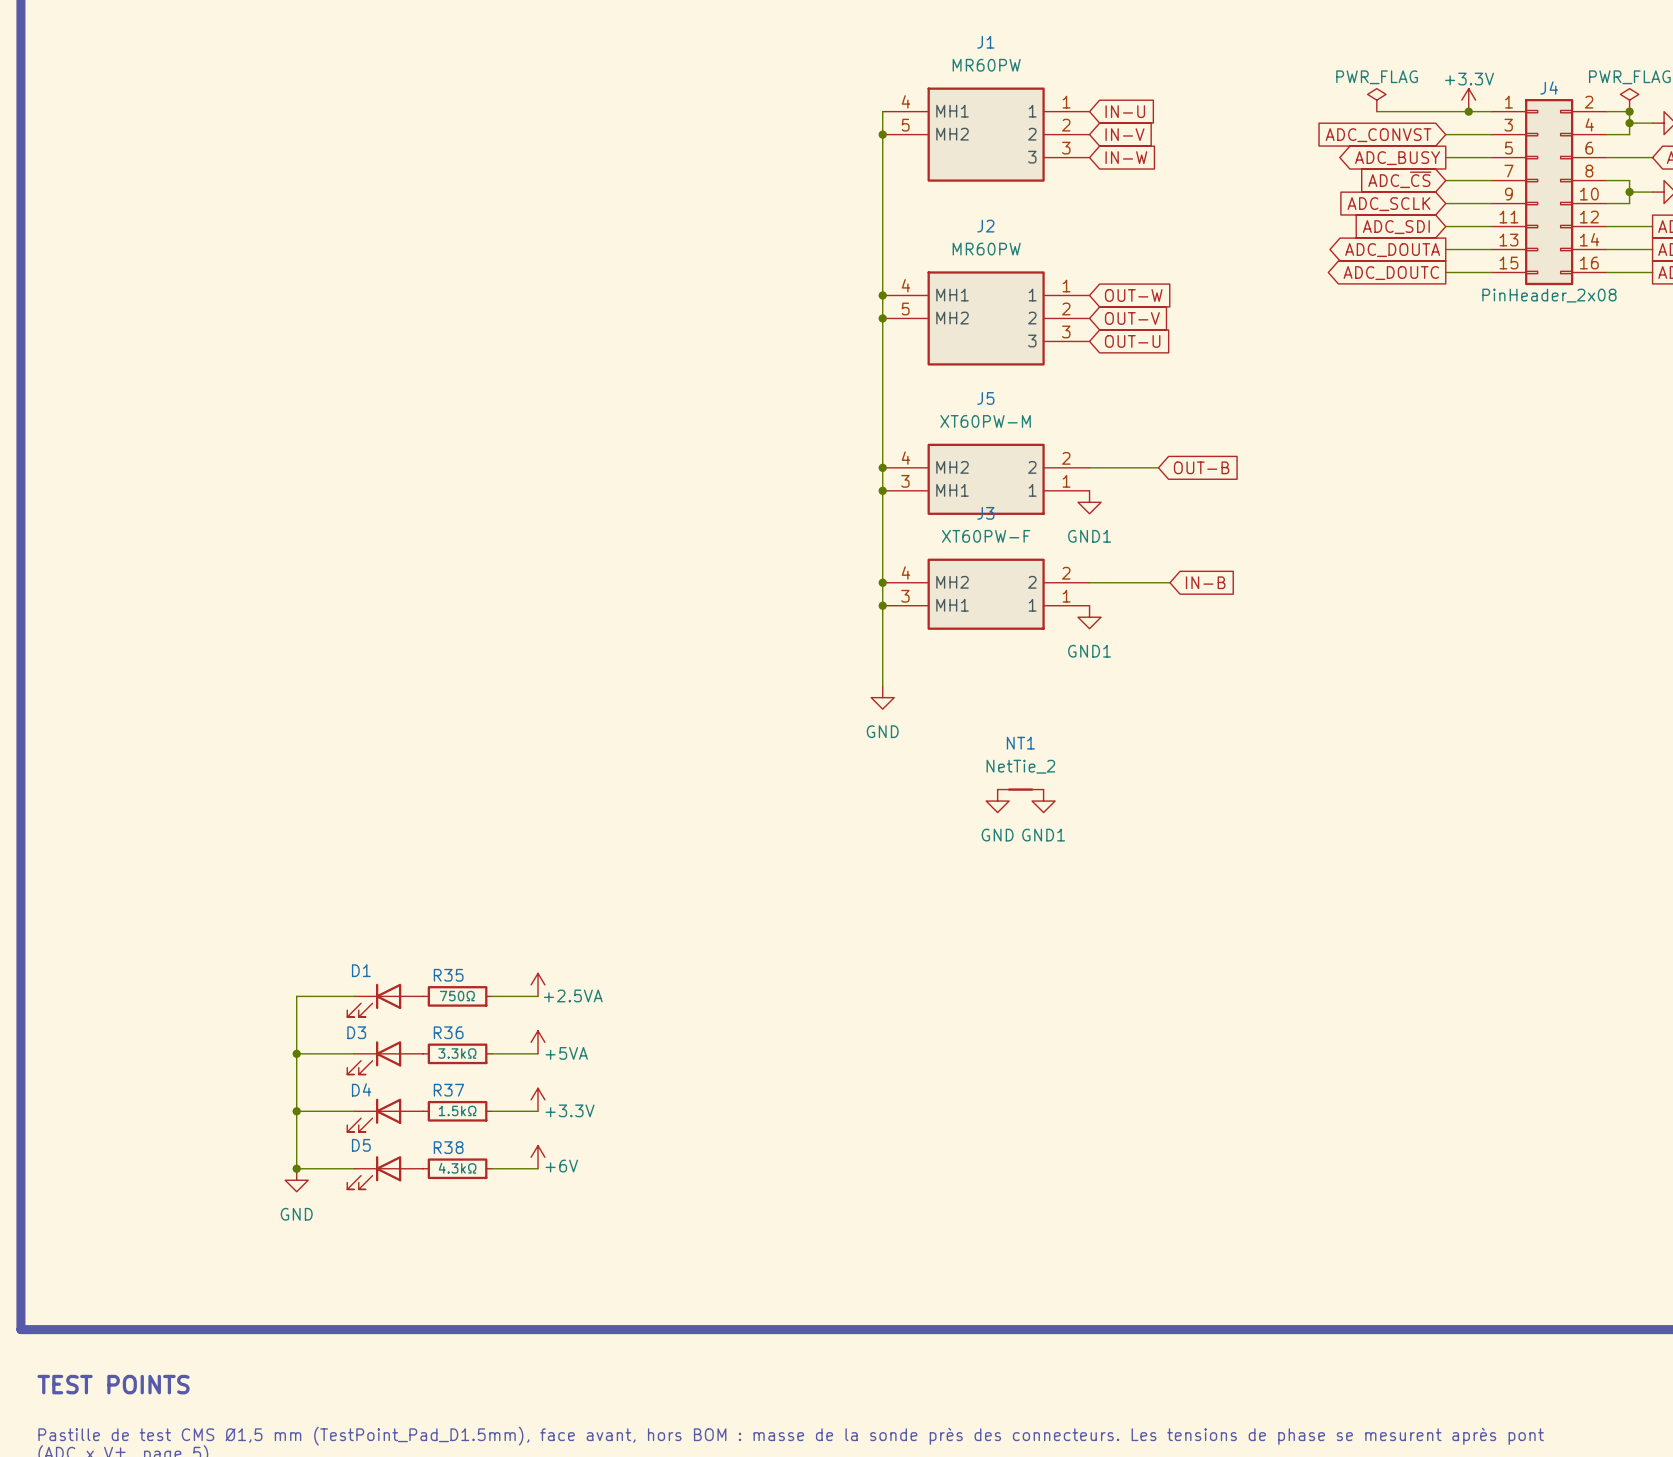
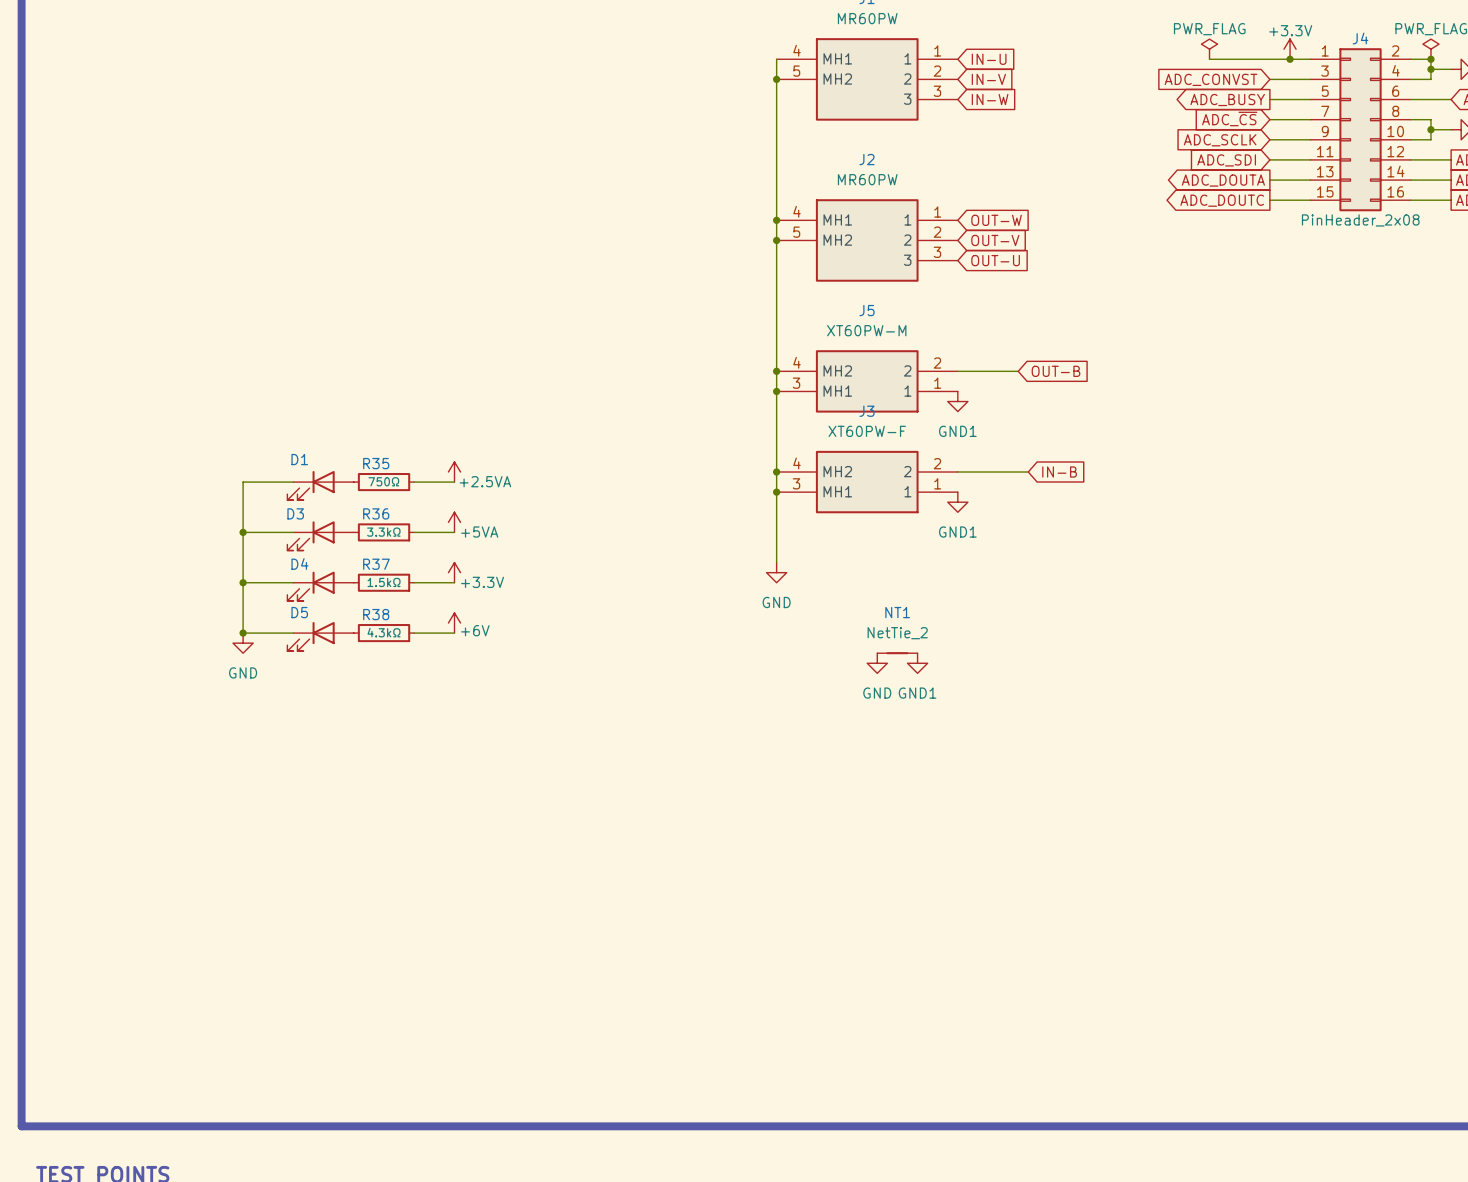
power symbol: none -> +2.5VA (454, 472)
wire: none -> (293, 482) (243, 482) (243, 633) (293, 633)
wire: none -> (414, 482) (454, 482)
power symbol: none -> +5VA (454, 522)
wire: none -> (243, 532) (293, 532)
junction: none -> (243, 532)
wire: none -> (414, 532) (454, 532)
power symbol: none -> +3.3V (454, 572)
wire: none -> (243, 582) (293, 582)
junction: none -> (243, 582)
wire: none -> (414, 582) (454, 582)
power symbol: none -> +6V (454, 623)
junction: none -> (243, 633)
wire: none -> (414, 633) (454, 633)
power symbol: none -> GND (243, 643)
power symbol: +2.5VA (538, 984) -> none
wire: (354, 996) (296, 996) (296, 1168) (354, 1168) -> none
R35 position: (457, 996) -> (384, 482)
wire: (492, 996) (538, 996) -> none
D1 position: (385, 1000) -> (320, 485)
power symbol: +5VA (538, 1042) -> none
wire: (296, 1053) (354, 1053) -> none
junction: (296, 1053) -> none
R36 position: (457, 1053) -> (384, 532)
wire: (492, 1053) (538, 1053) -> none
D3 position: (385, 1057) -> (320, 535)
power symbol: +3.3V (538, 1099) -> none
wire: (296, 1111) (354, 1111) -> none
junction: (296, 1111) -> none
R37 position: (457, 1111) -> (384, 582)
wire: (492, 1111) (538, 1111) -> none
D4 position: (385, 1115) -> (320, 586)
power symbol: +6V (538, 1157) -> none
junction: (296, 1168) -> none
R38 position: (457, 1168) -> (384, 633)
wire: (492, 1168) (538, 1168) -> none
D5 position: (385, 1172) -> (320, 636)
power symbol: GND (296, 1180) -> none

